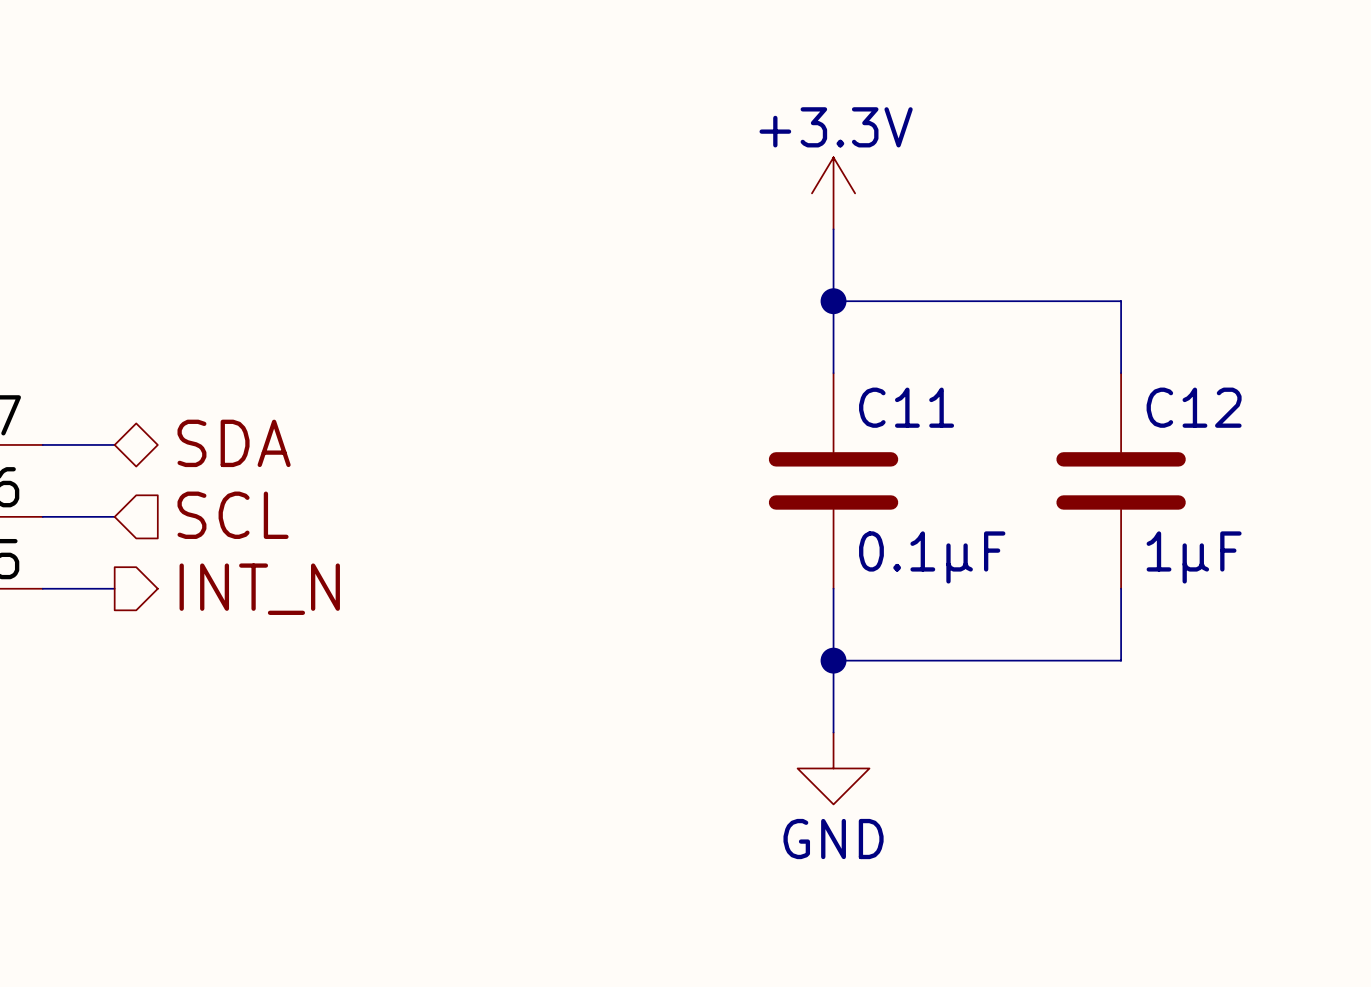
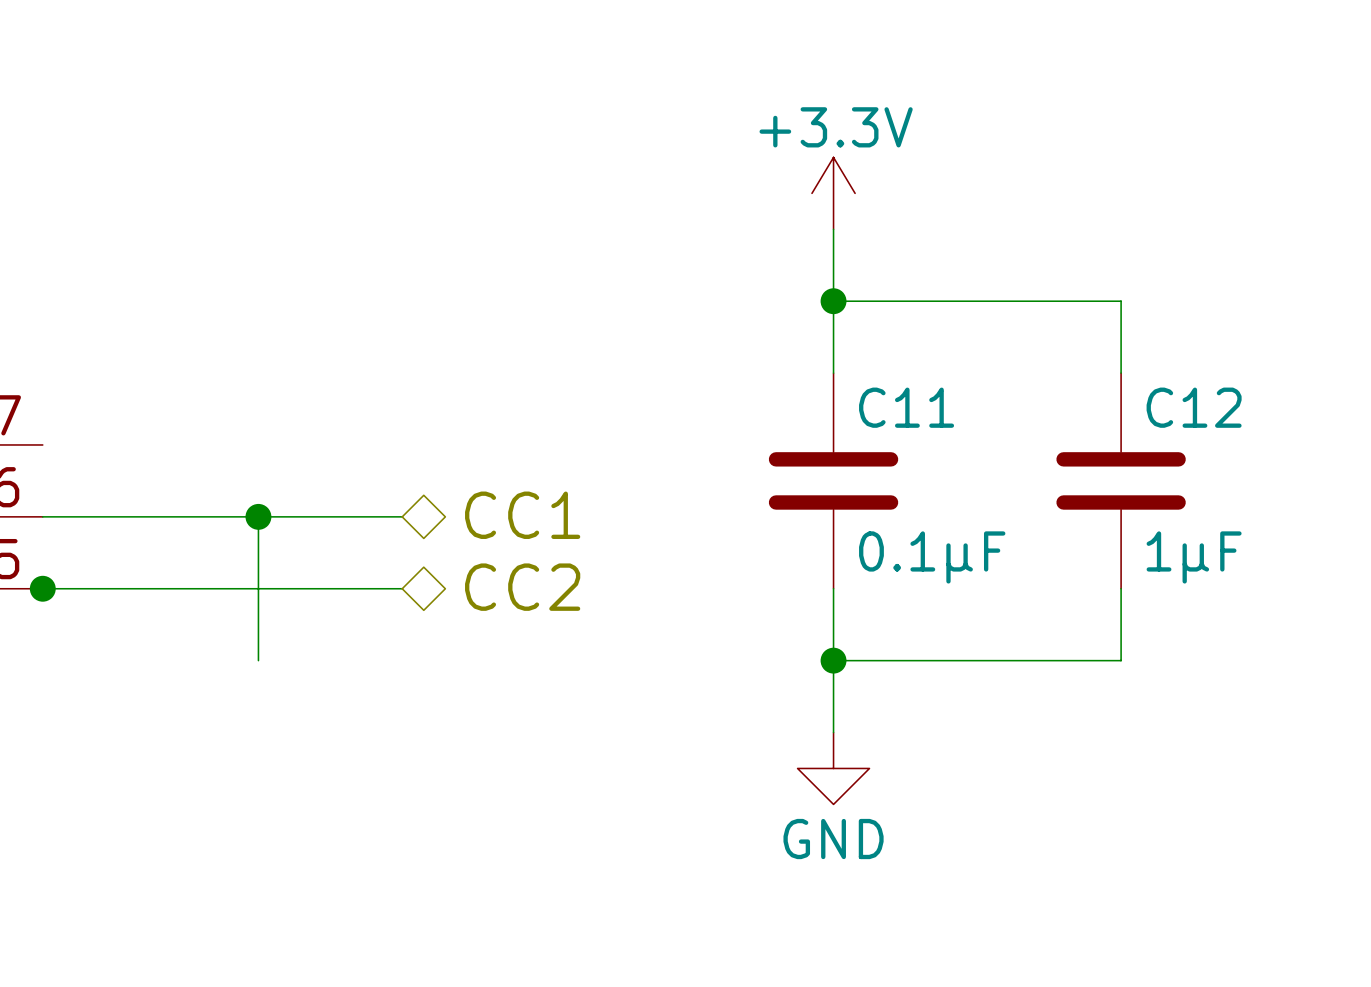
hierarchical label: SDA (234, 443) -> none
wire: (42, 444) (114, 444) -> none
hierarchical label: SCL (233, 515) -> none
hierarchical label: none -> CC1 (522, 515)
wire: none -> (114, 516) (402, 516)
wire: none -> (258, 516) (258, 660)
junction: none -> (258, 516)
hierarchical label: none -> CC2 (522, 587)
junction: none -> (42, 588)
wire: none -> (114, 588) (402, 588)
hierarchical label: INT_N (259, 589) -> none

